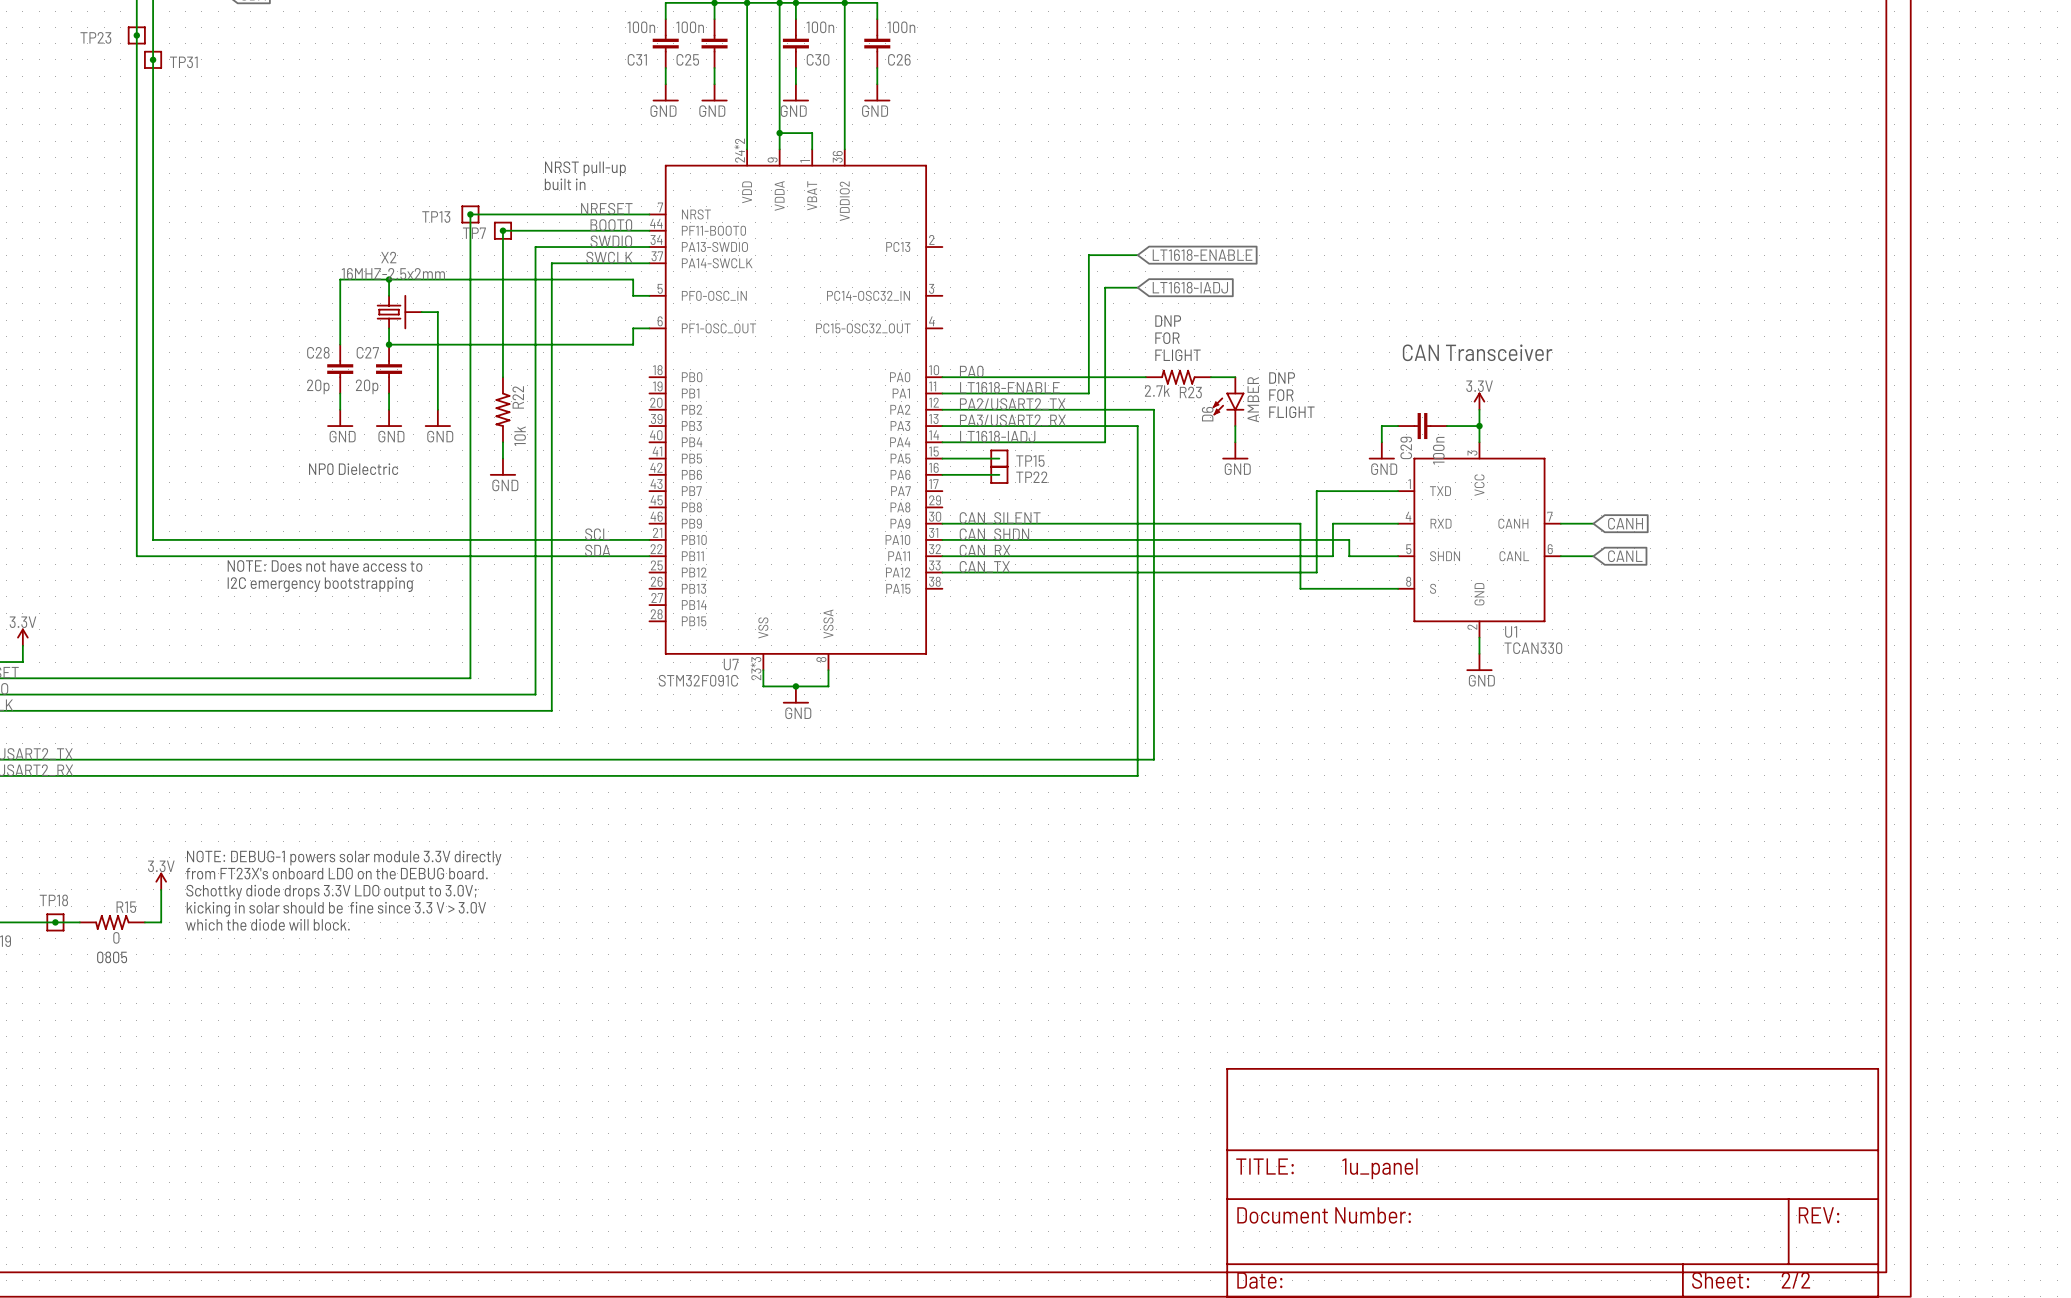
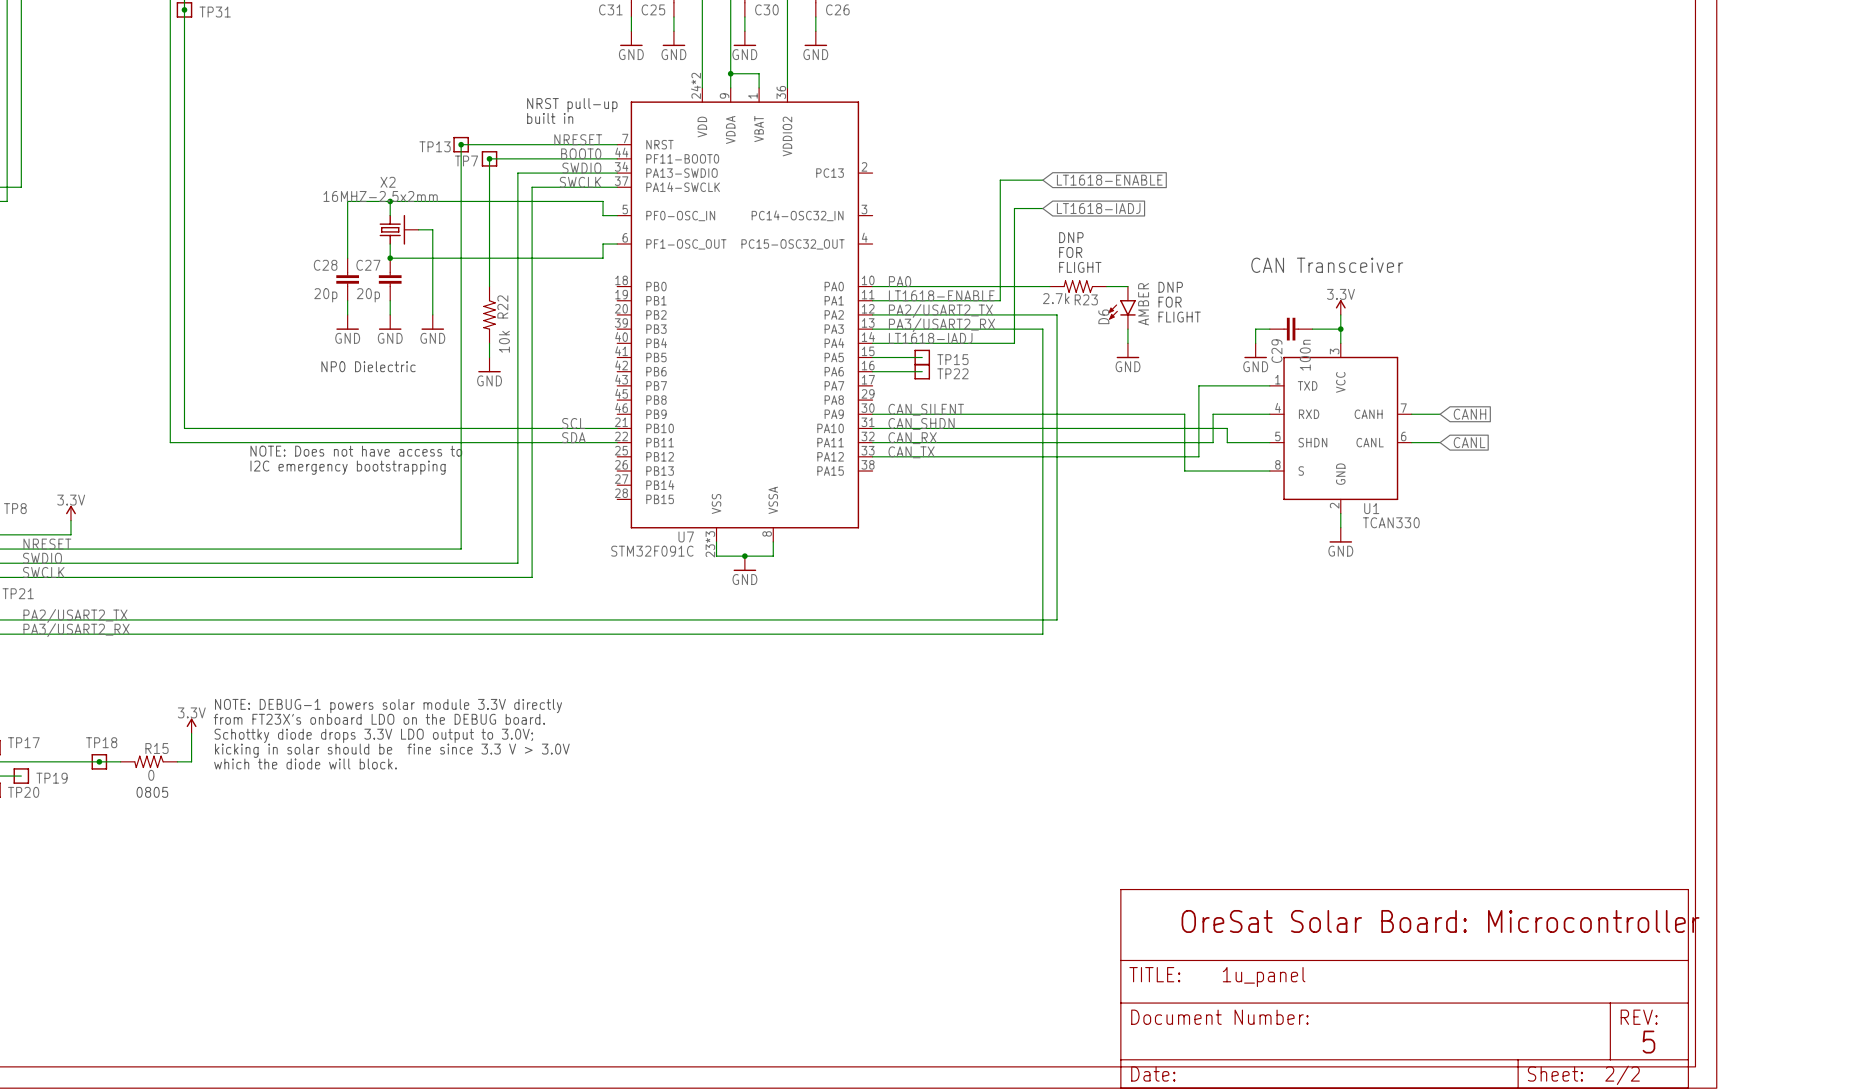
text: none -> OreSat Solar Board: Microcontroller (1440, 921)
text: none -> 5 (1648, 1042)

